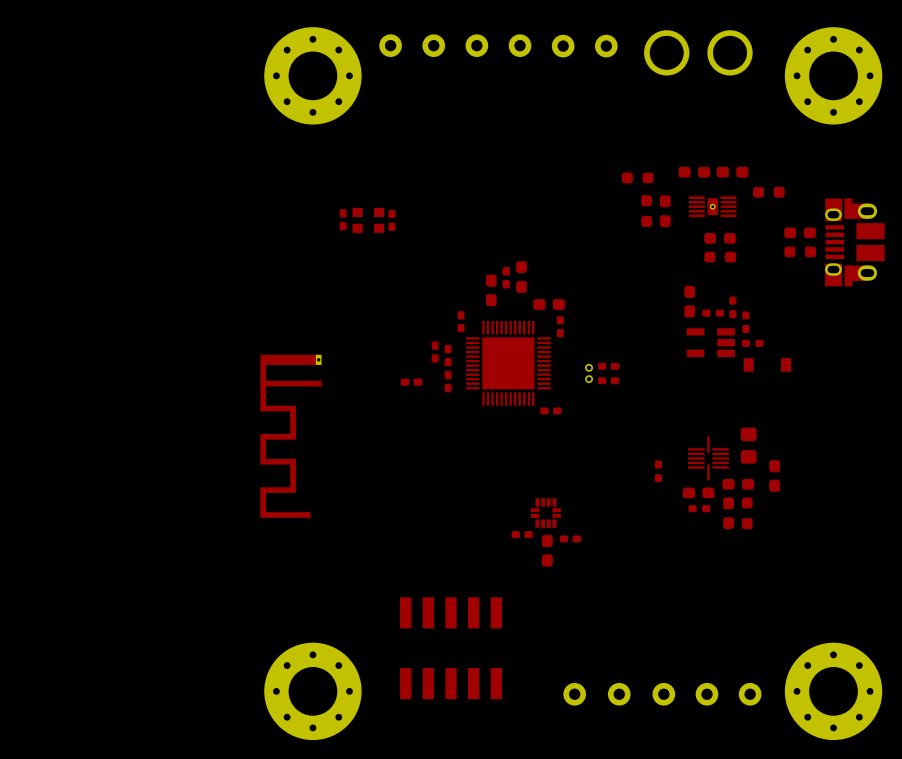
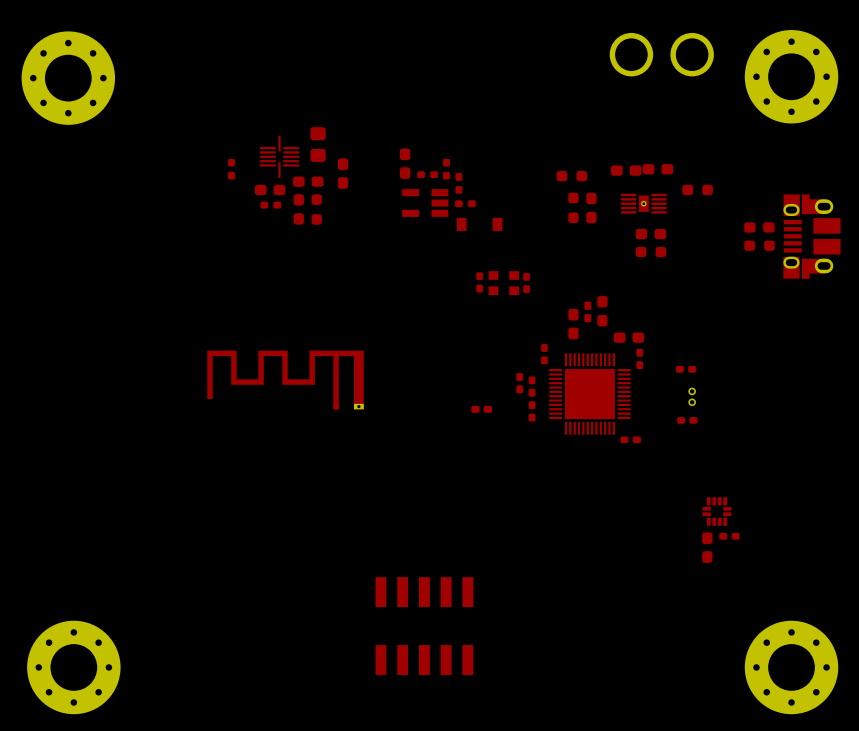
part: (390, 45) -> none
part: (433, 45) -> none
part: (476, 45) -> none
part: (520, 45) -> none
part: (563, 46) -> none
part: (606, 46) -> none
part position: (312, 75) -> (68, 78)
part: none -> (318, 144)
part: none -> (279, 156)
part: none -> (405, 163)
part: none -> (231, 169)
part: none -> (446, 169)
part: (732, 172) -> none
part: none -> (626, 170)
part: none -> (342, 173)
part: none -> (427, 174)
part: (637, 177) -> none
part: none -> (571, 176)
part: none -> (308, 181)
part: none -> (458, 183)
part: (768, 192) -> none
part: none -> (270, 189)
part: none -> (697, 189)
part position: (712, 206) -> (643, 203)
part: none -> (425, 203)
part: none -> (465, 203)
part: none -> (270, 205)
part footprint: [339, 209, 347, 231] -> [311, 194, 322, 225]
part: (646, 211) -> none
part: (665, 211) -> none
part: none -> (573, 207)
part: none -> (591, 208)
part: none -> (298, 209)
part position: (368, 220) -> (503, 283)
part: (392, 220) -> none
part: none -> (479, 224)
part: (720, 238) -> none
part: none -> (650, 234)
part: (720, 257) -> none
part: none -> (651, 252)
part: (506, 277) -> none
part: (521, 277) -> none
part: (491, 290) -> none
part: none -> (479, 282)
part: none -> (526, 283)
part: (689, 301) -> none
part: (549, 304) -> none
part: (732, 307) -> none
part: (713, 313) -> none
part: none -> (587, 311)
part: none -> (602, 311)
part: (461, 321) -> none
part: (745, 322) -> none
part: (560, 326) -> none
part: none -> (573, 324)
part: (710, 342) -> none
part: (752, 343) -> none
part: none -> (628, 337)
part: (435, 351) -> none
part: (448, 355) -> none
part position: (508, 363) -> (589, 394)
part: none -> (544, 354)
part: (767, 364) -> none
part: (608, 366) -> none
part: none -> (639, 358)
part position: (589, 373) -> (692, 396)
part: (608, 380) -> none
part: none -> (685, 369)
part: (448, 381) -> none
part: (411, 382) -> none
part: none -> (519, 383)
part: none -> (532, 386)
part: (550, 410) -> none
part: none -> (481, 409)
part: none -> (532, 411)
part: none -> (687, 420)
part rotation: 0° (290, 436) -> 90° clockwise (285, 379)
part: (748, 445) -> none
part: none -> (630, 439)
part: (708, 458) -> none
part: (658, 471) -> none
part: (774, 475) -> none
part: (738, 484) -> none
part: (698, 492) -> none
part: (699, 508) -> none
part position: (545, 513) -> (716, 511)
part: (728, 513) -> none
part: (747, 513) -> none
part: (522, 534) -> none
part: (570, 538) -> none
part: (547, 550) -> none
part: none -> (729, 536)
part: none -> (707, 547)
part position: (312, 691) -> (73, 667)
part: (574, 694) -> none
part: (619, 694) -> none
part: (663, 694) -> none
part: (706, 694) -> none
part: (750, 694) -> none

